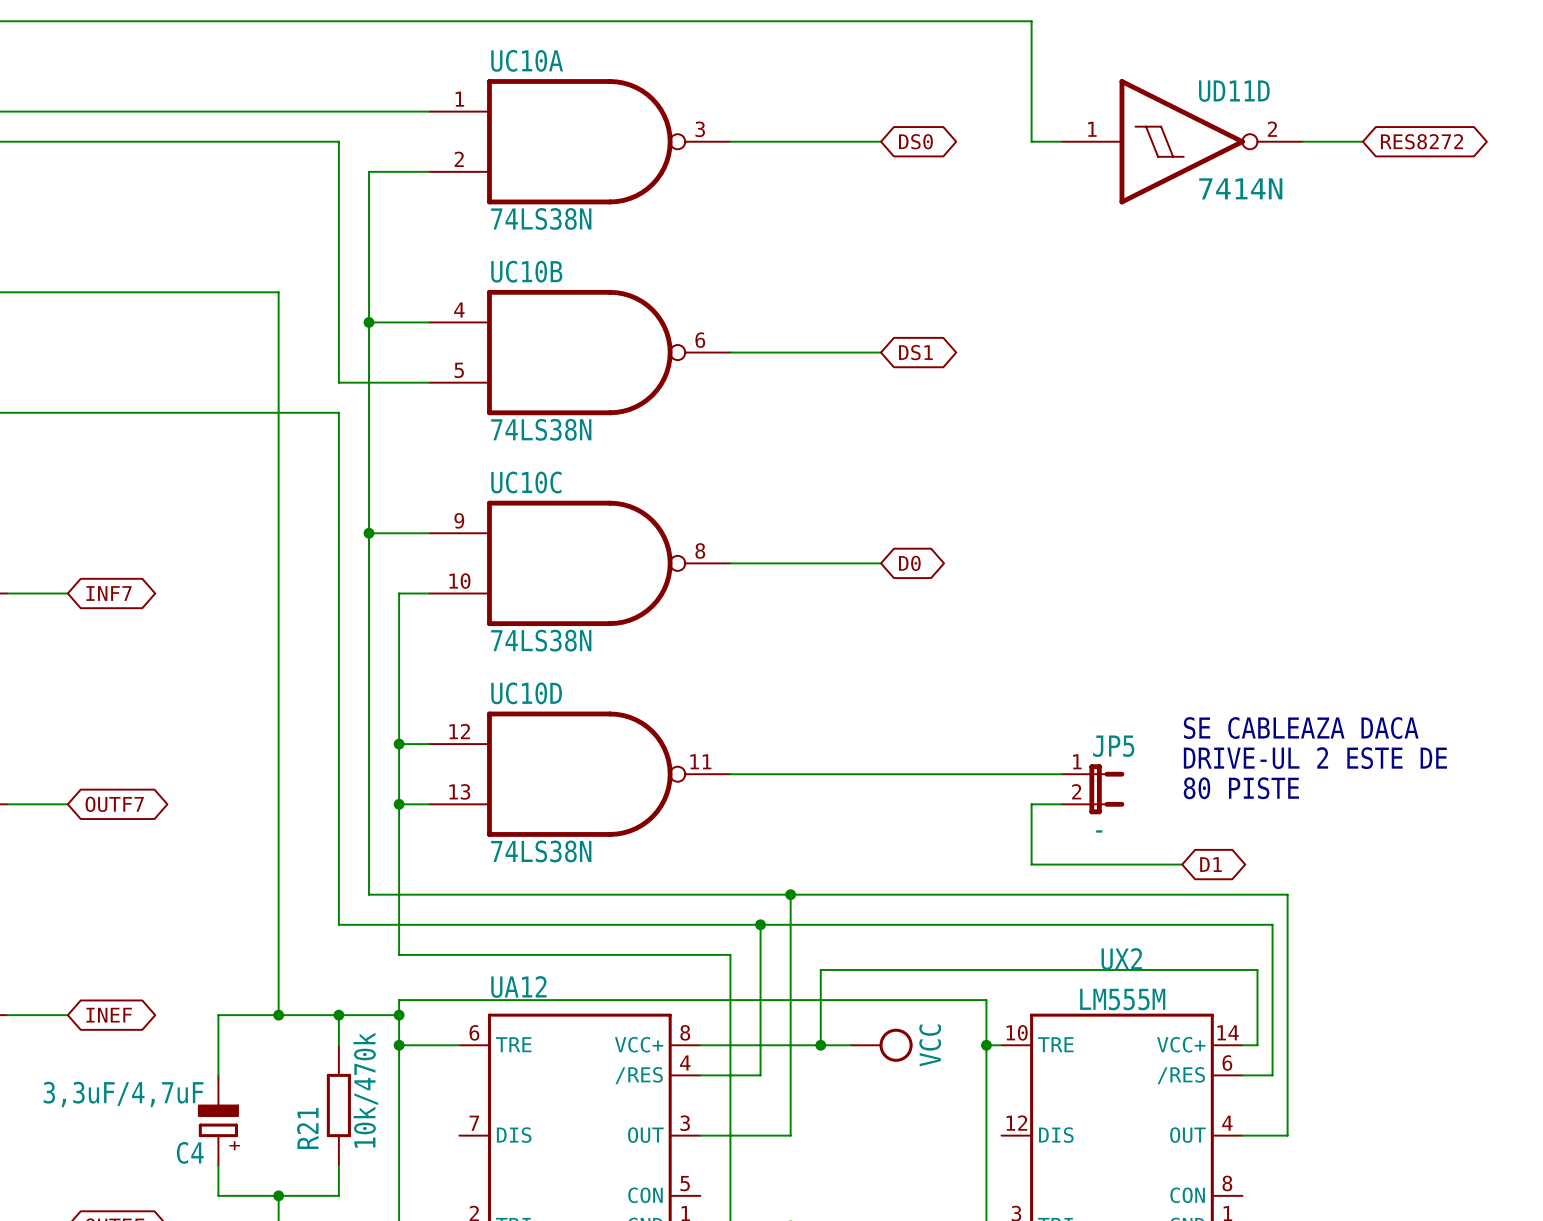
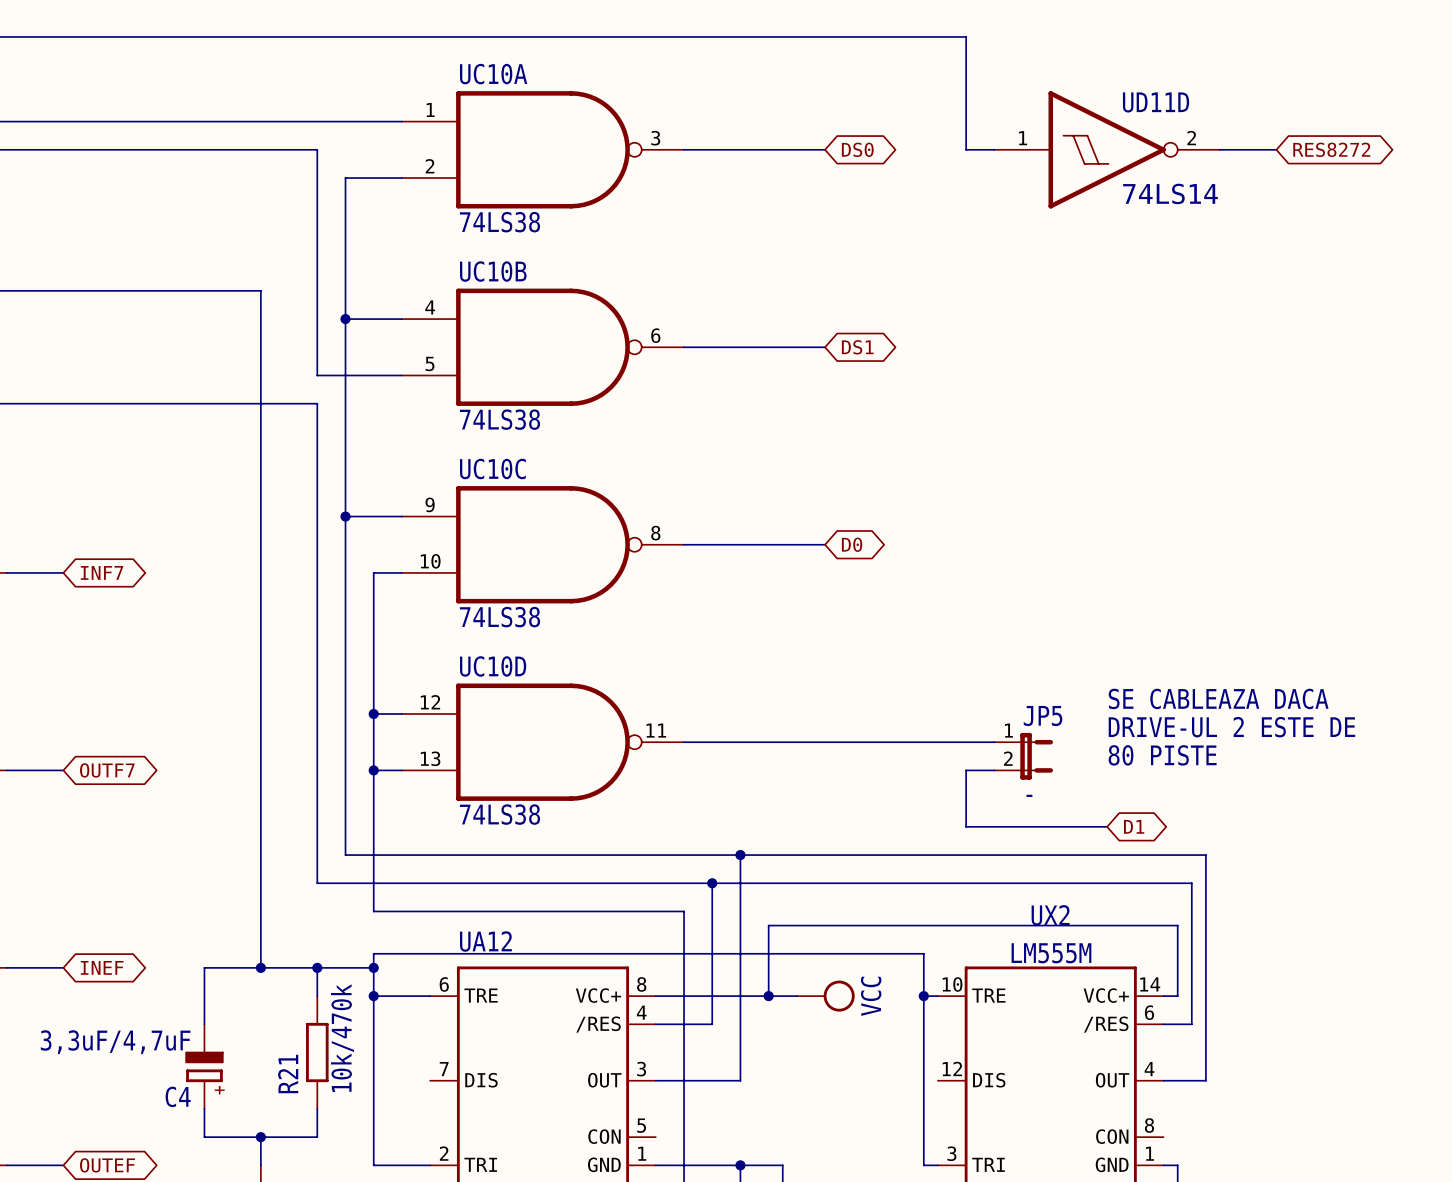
UD11D value: 7414N (1240, 188) -> 74LS14 (1170, 193)
UC10A value: 74LS38N (541, 218) -> 74LS38 (499, 222)
UC10B value: 74LS38N (541, 429) -> 74LS38 (499, 419)
UC10C value: 74LS38N (541, 640) -> 74LS38 (499, 617)
UC10D value: 74LS38N (541, 851) -> 74LS38 (499, 814)

